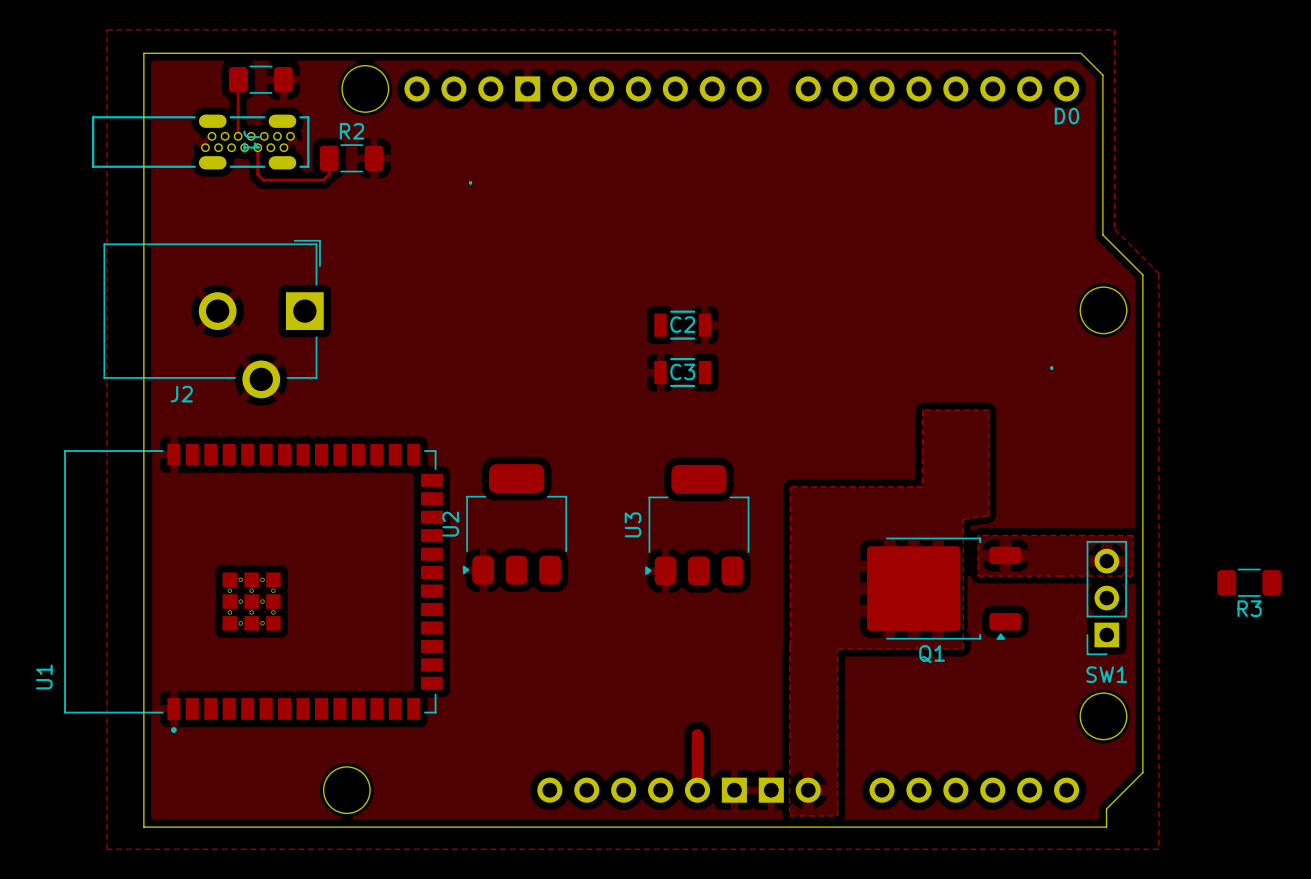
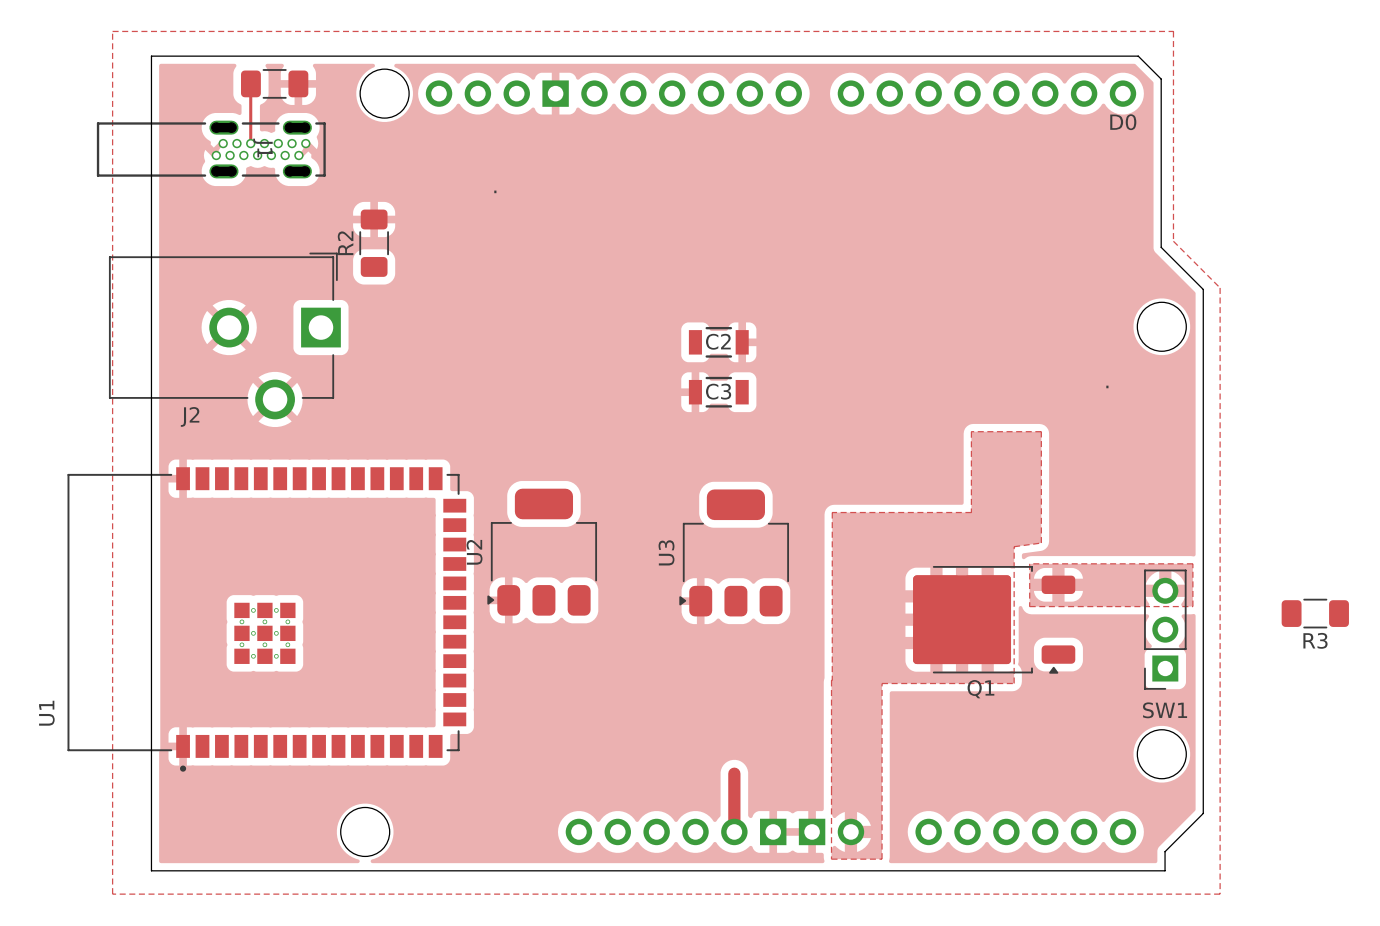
R2 name position: R2 (352, 131) -> R2 (345, 243)
track: (257, 147) (257, 174) (263, 180) (323, 180) (329, 174) (329, 158) -> none
R2 rotation: 0° (351, 158) -> 90° clockwise (374, 243)
R2 position: (351, 158) -> (374, 243)

